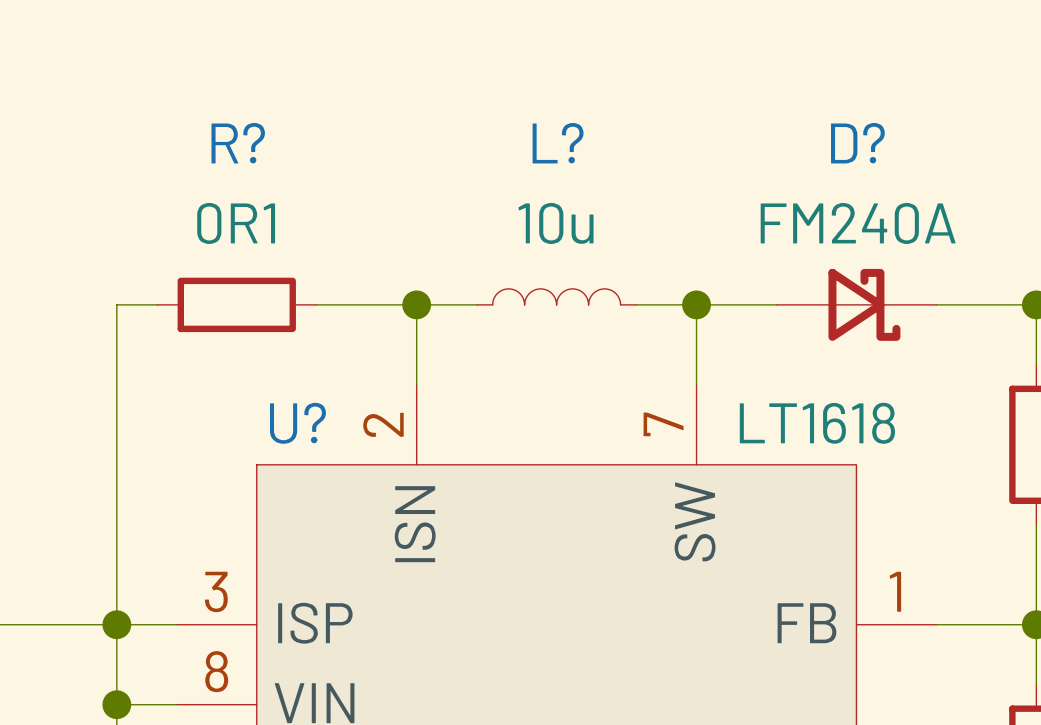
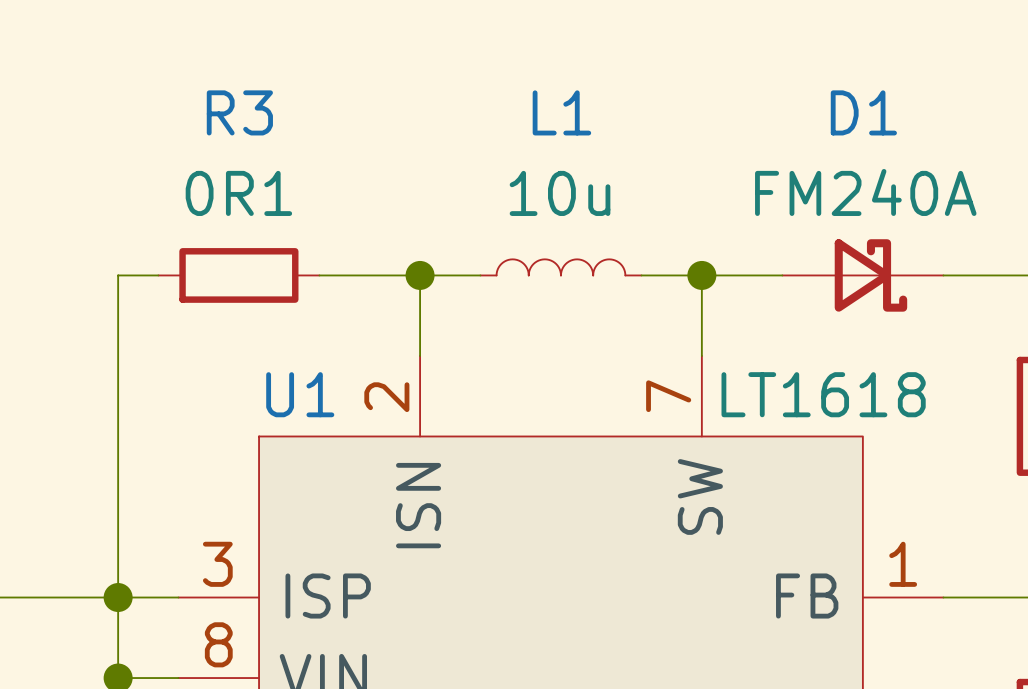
R? name: R? (238, 143) -> R3 (239, 112)
L? name: L? (558, 143) -> L1 (561, 112)
D? name: D? (857, 143) -> D1 (863, 112)
U? name: U? (297, 423) -> U1 (300, 394)

